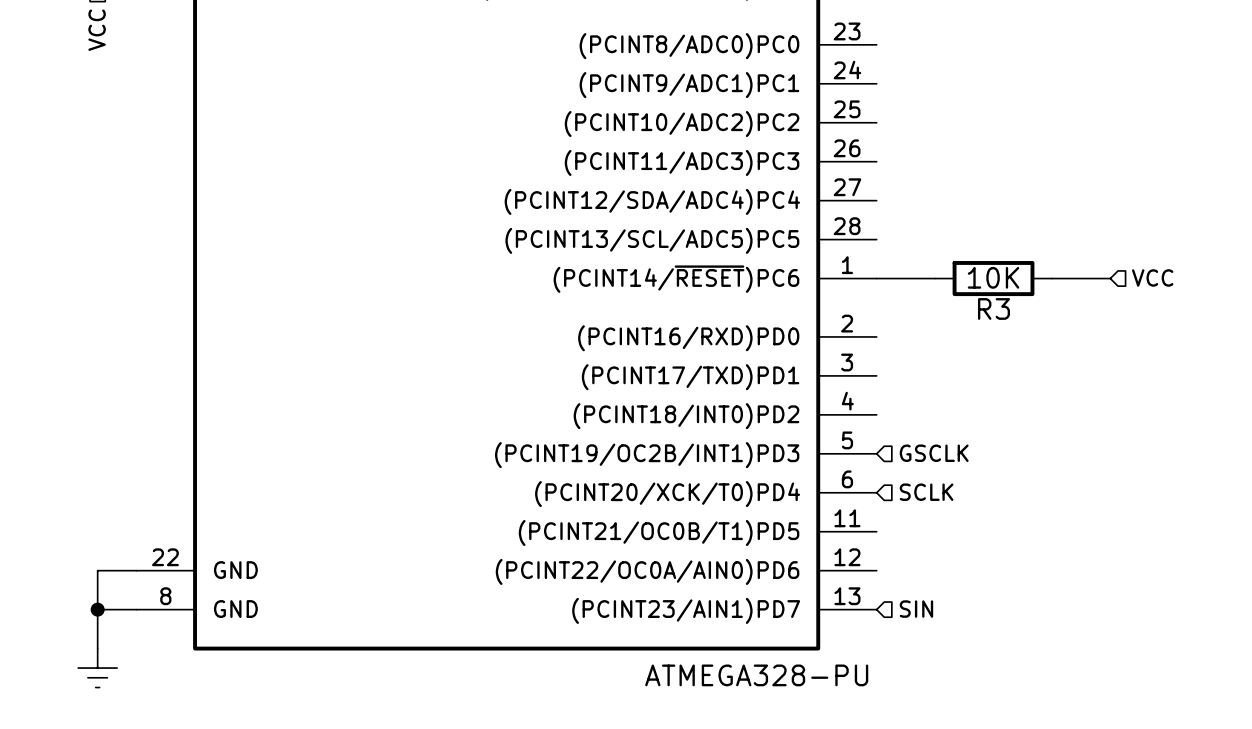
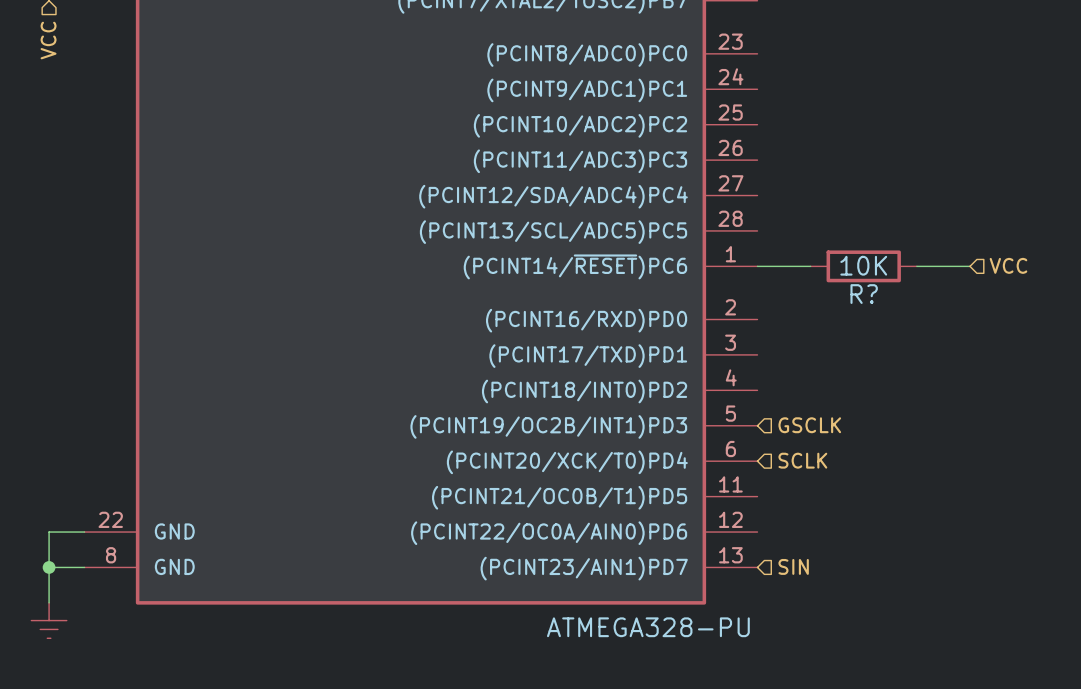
R3 name: R3 (993, 308) -> R? (864, 294)

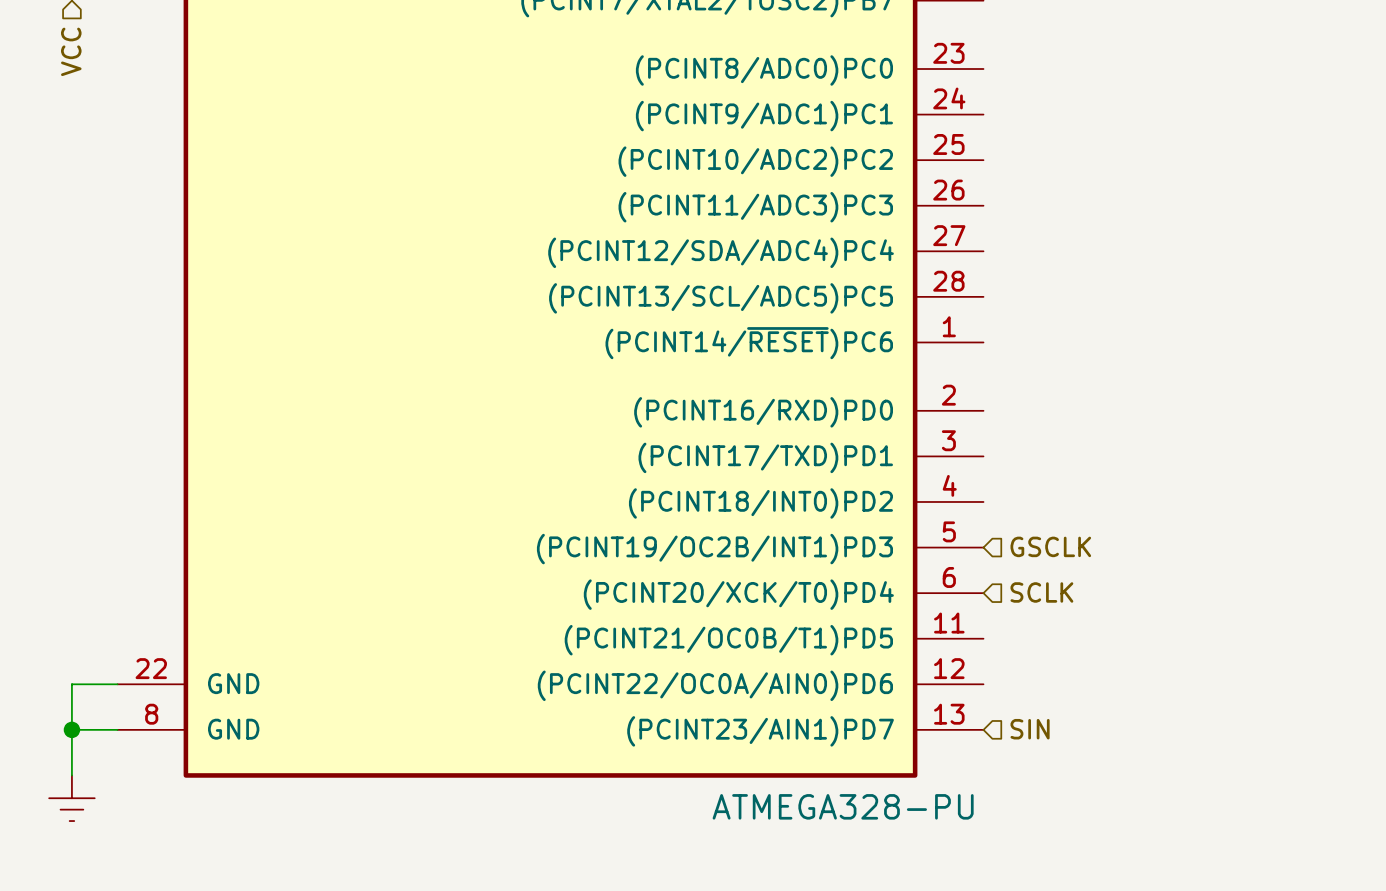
hierarchical label: VCC (1008, 265) -> none
wire: (757, 266) (810, 266) -> none
R?: 10K (863, 266) -> none
wire: (916, 266) (969, 266) -> none

